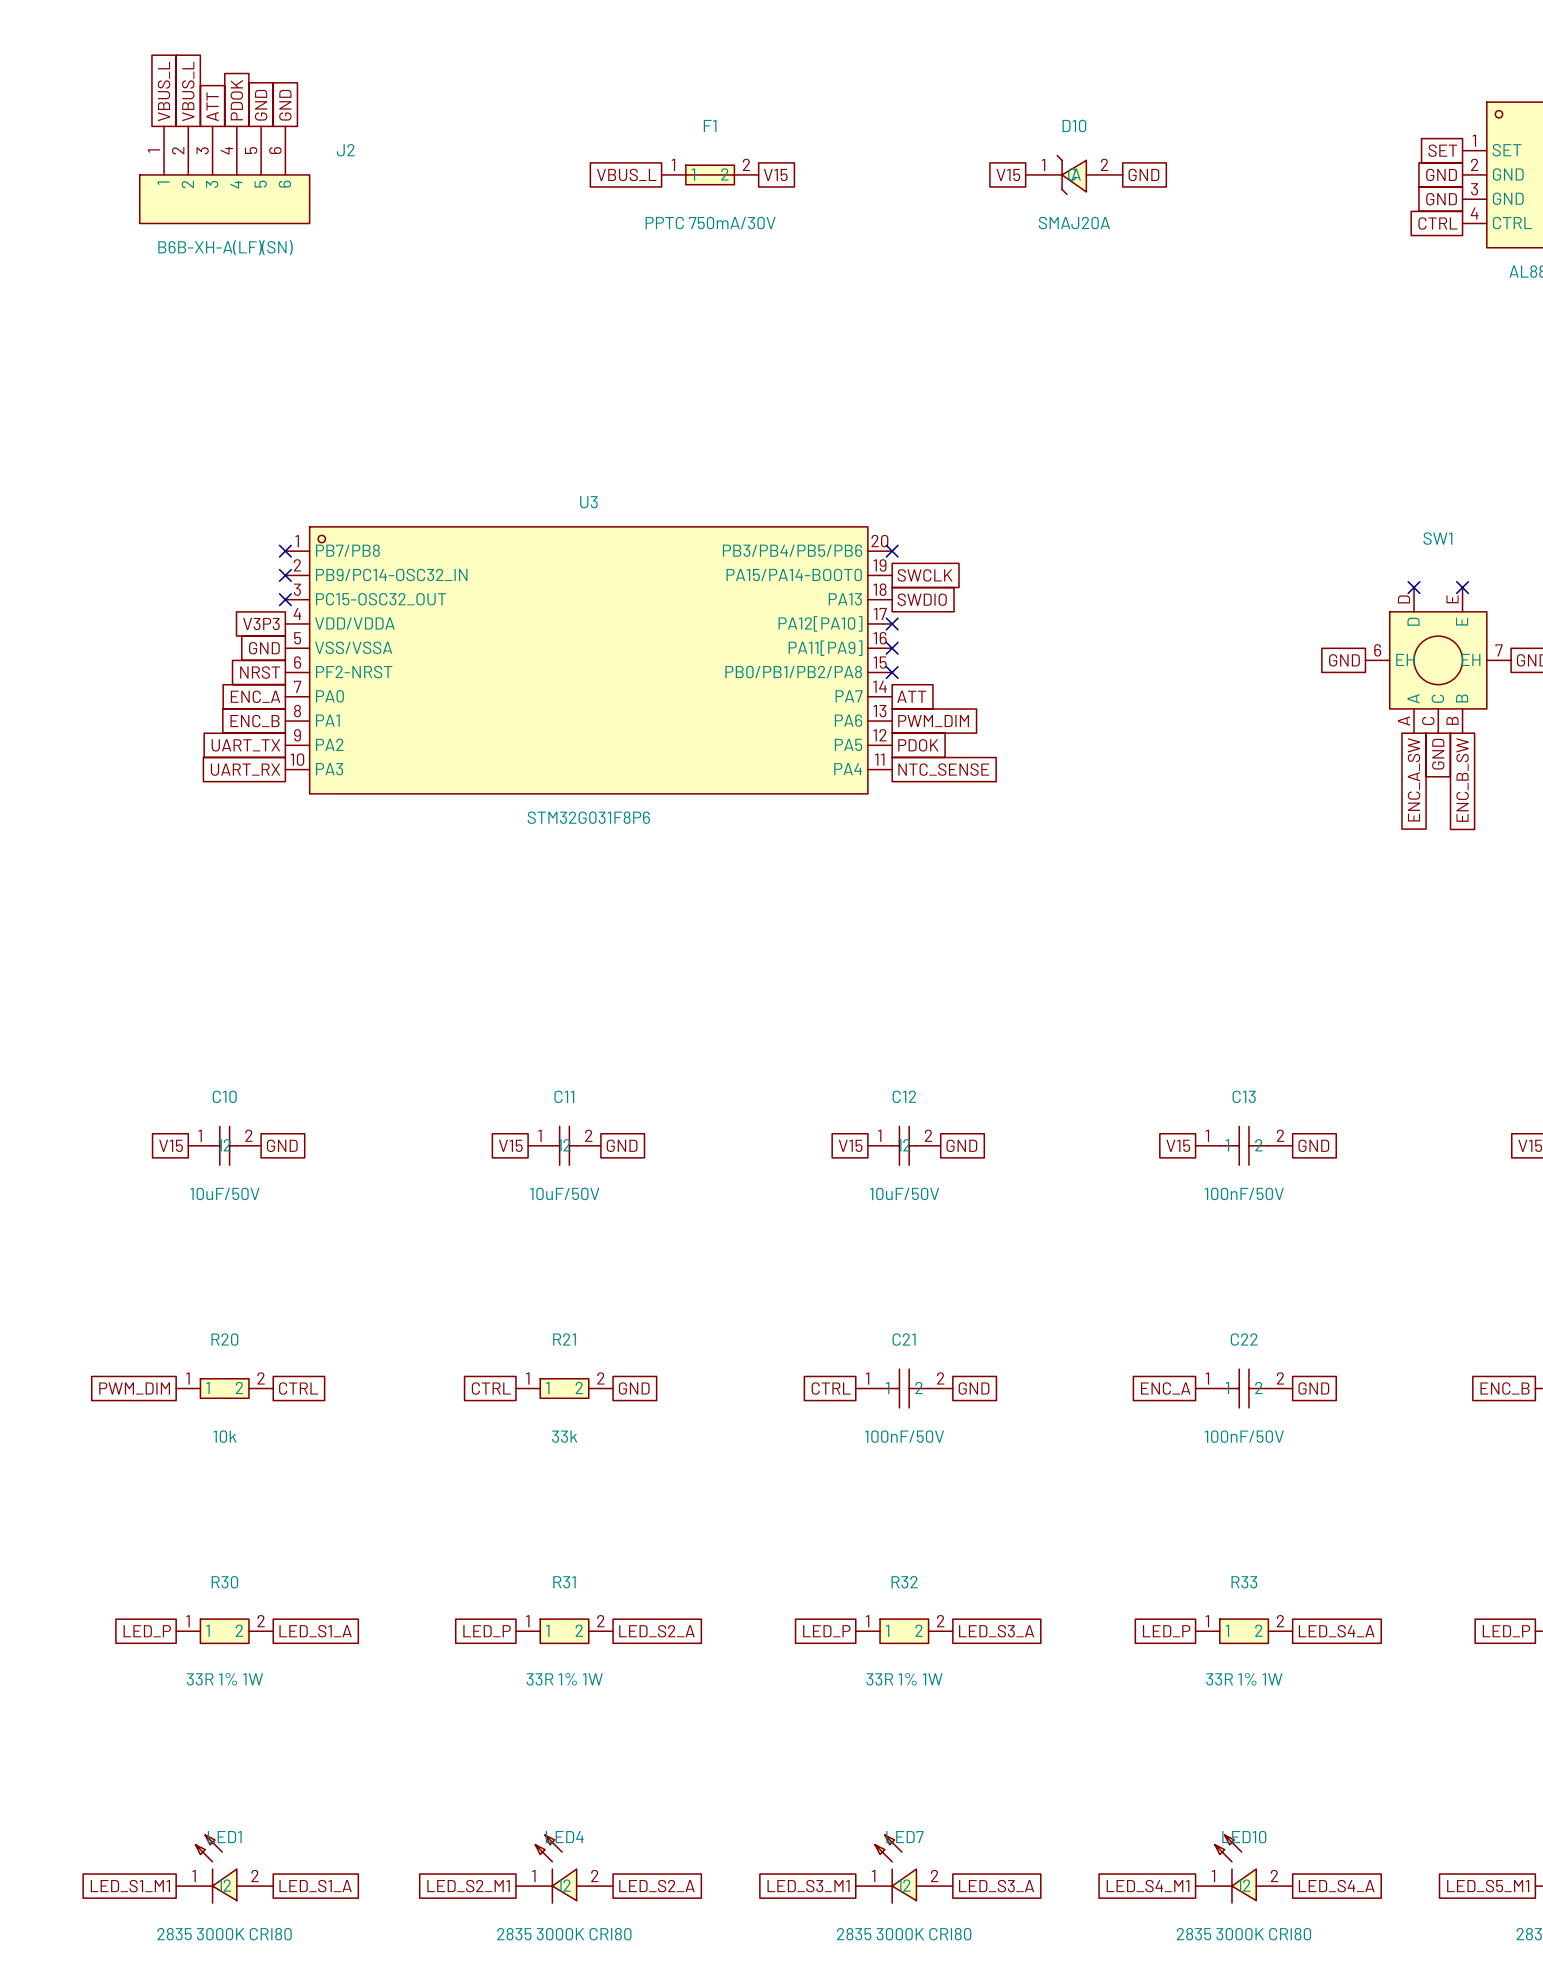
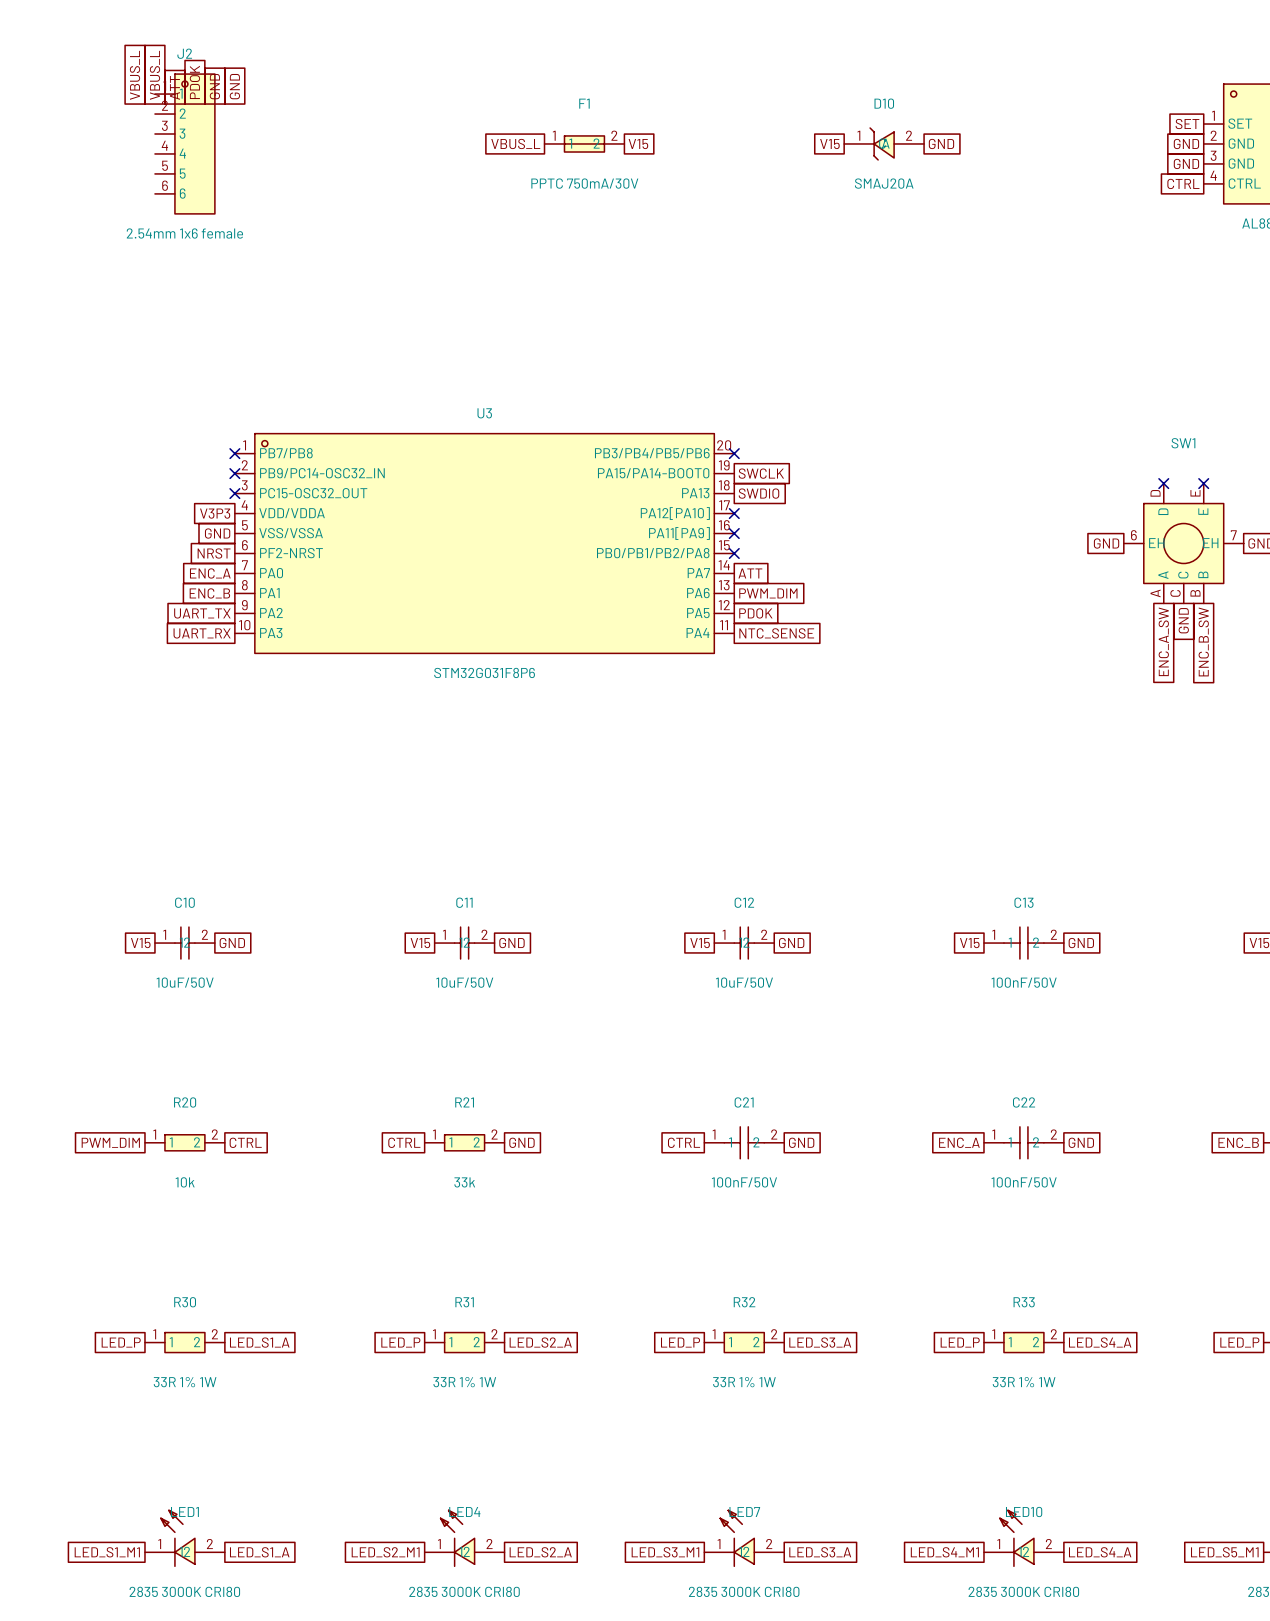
J2 symbol: [139, 126, 310, 224] -> [154, 74, 215, 214]
J2 name position: J2 (345, 150) -> J2 (184, 53)
J2 value: B6B-XH-A(LF)(SN) (225, 247) -> 2.54mm 1x6 female (184, 233)

